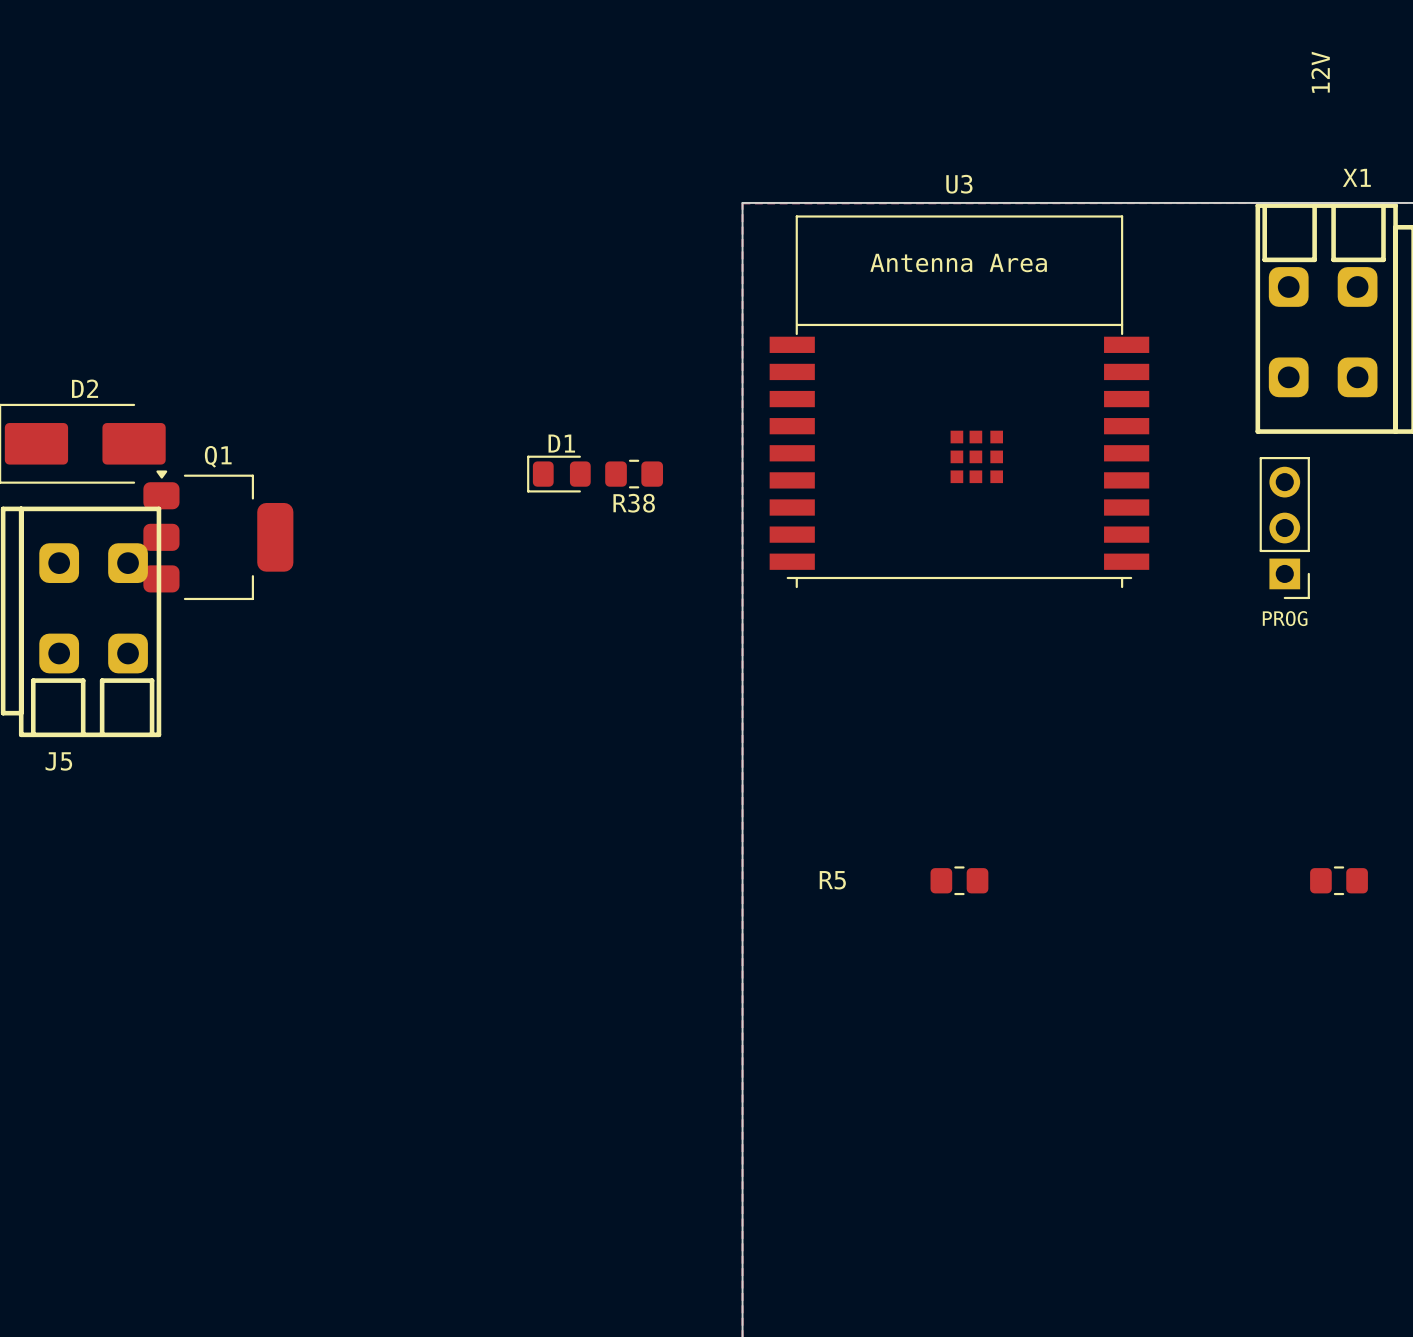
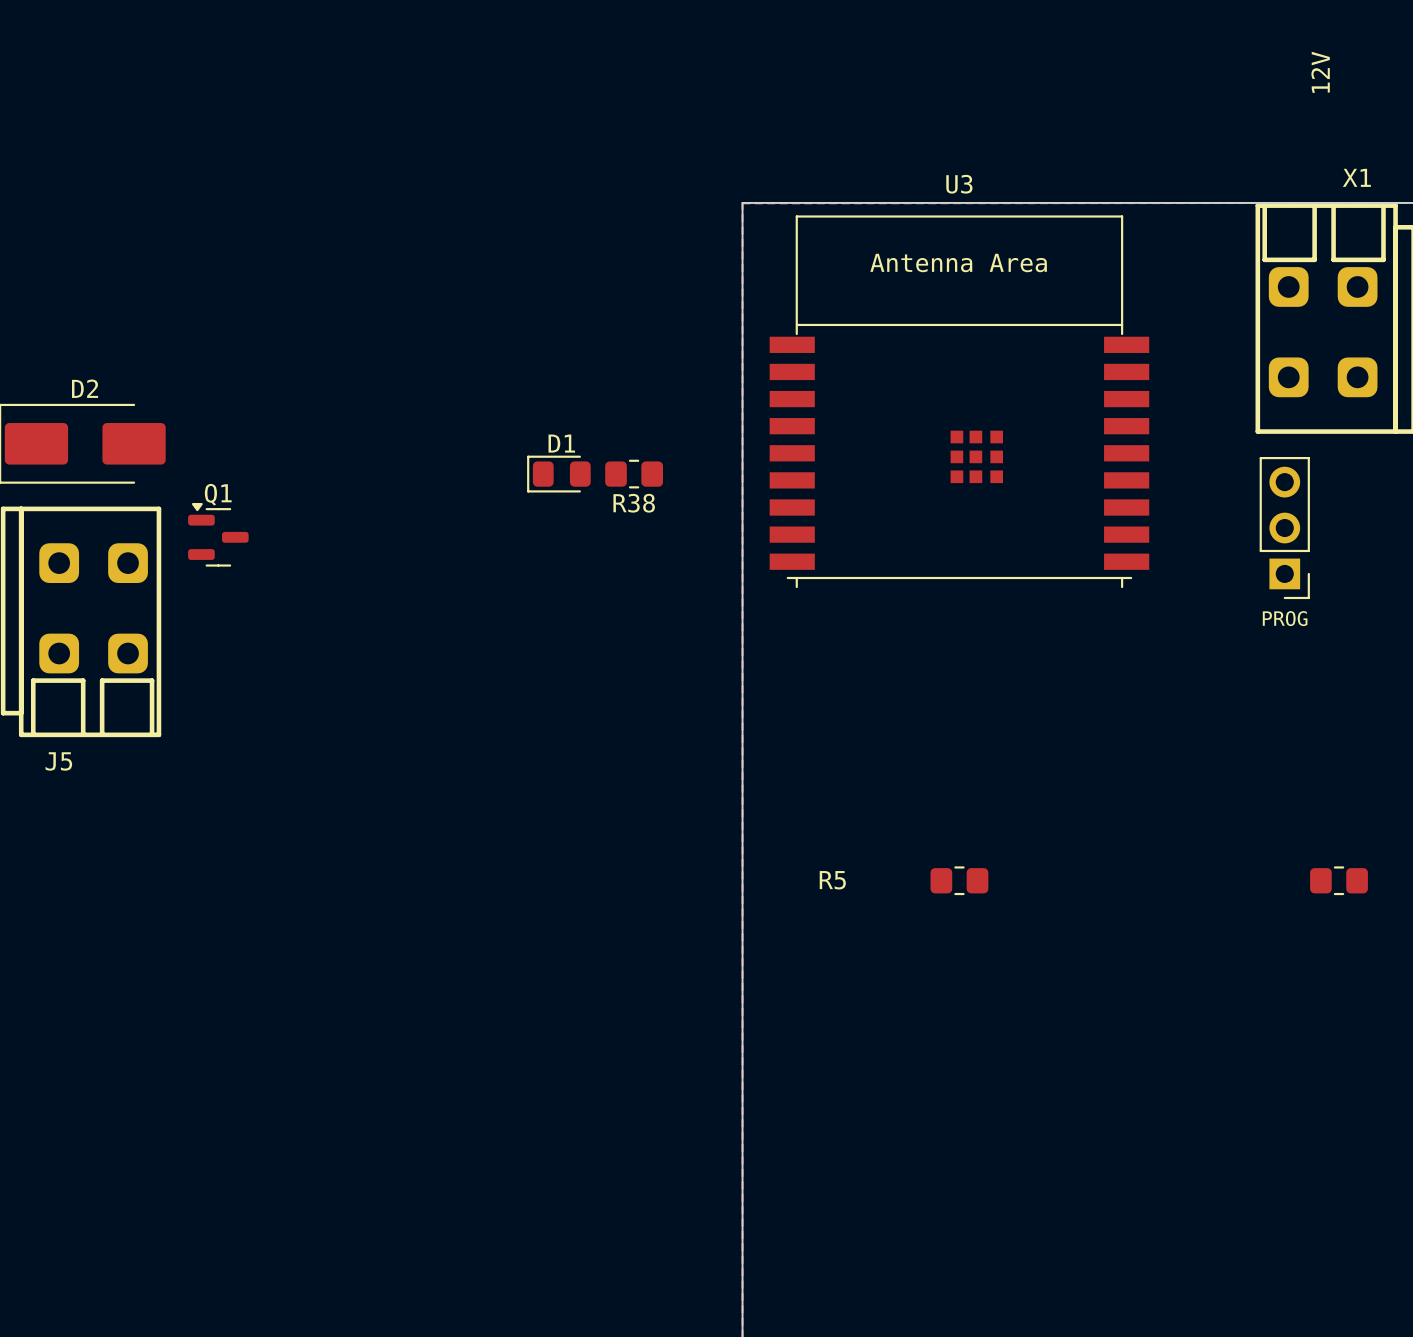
Q1 name position: Q1 (218, 456) -> Q1 (218, 494)
Q1 footprint: [143, 470, 294, 601] -> [188, 502, 249, 567]

